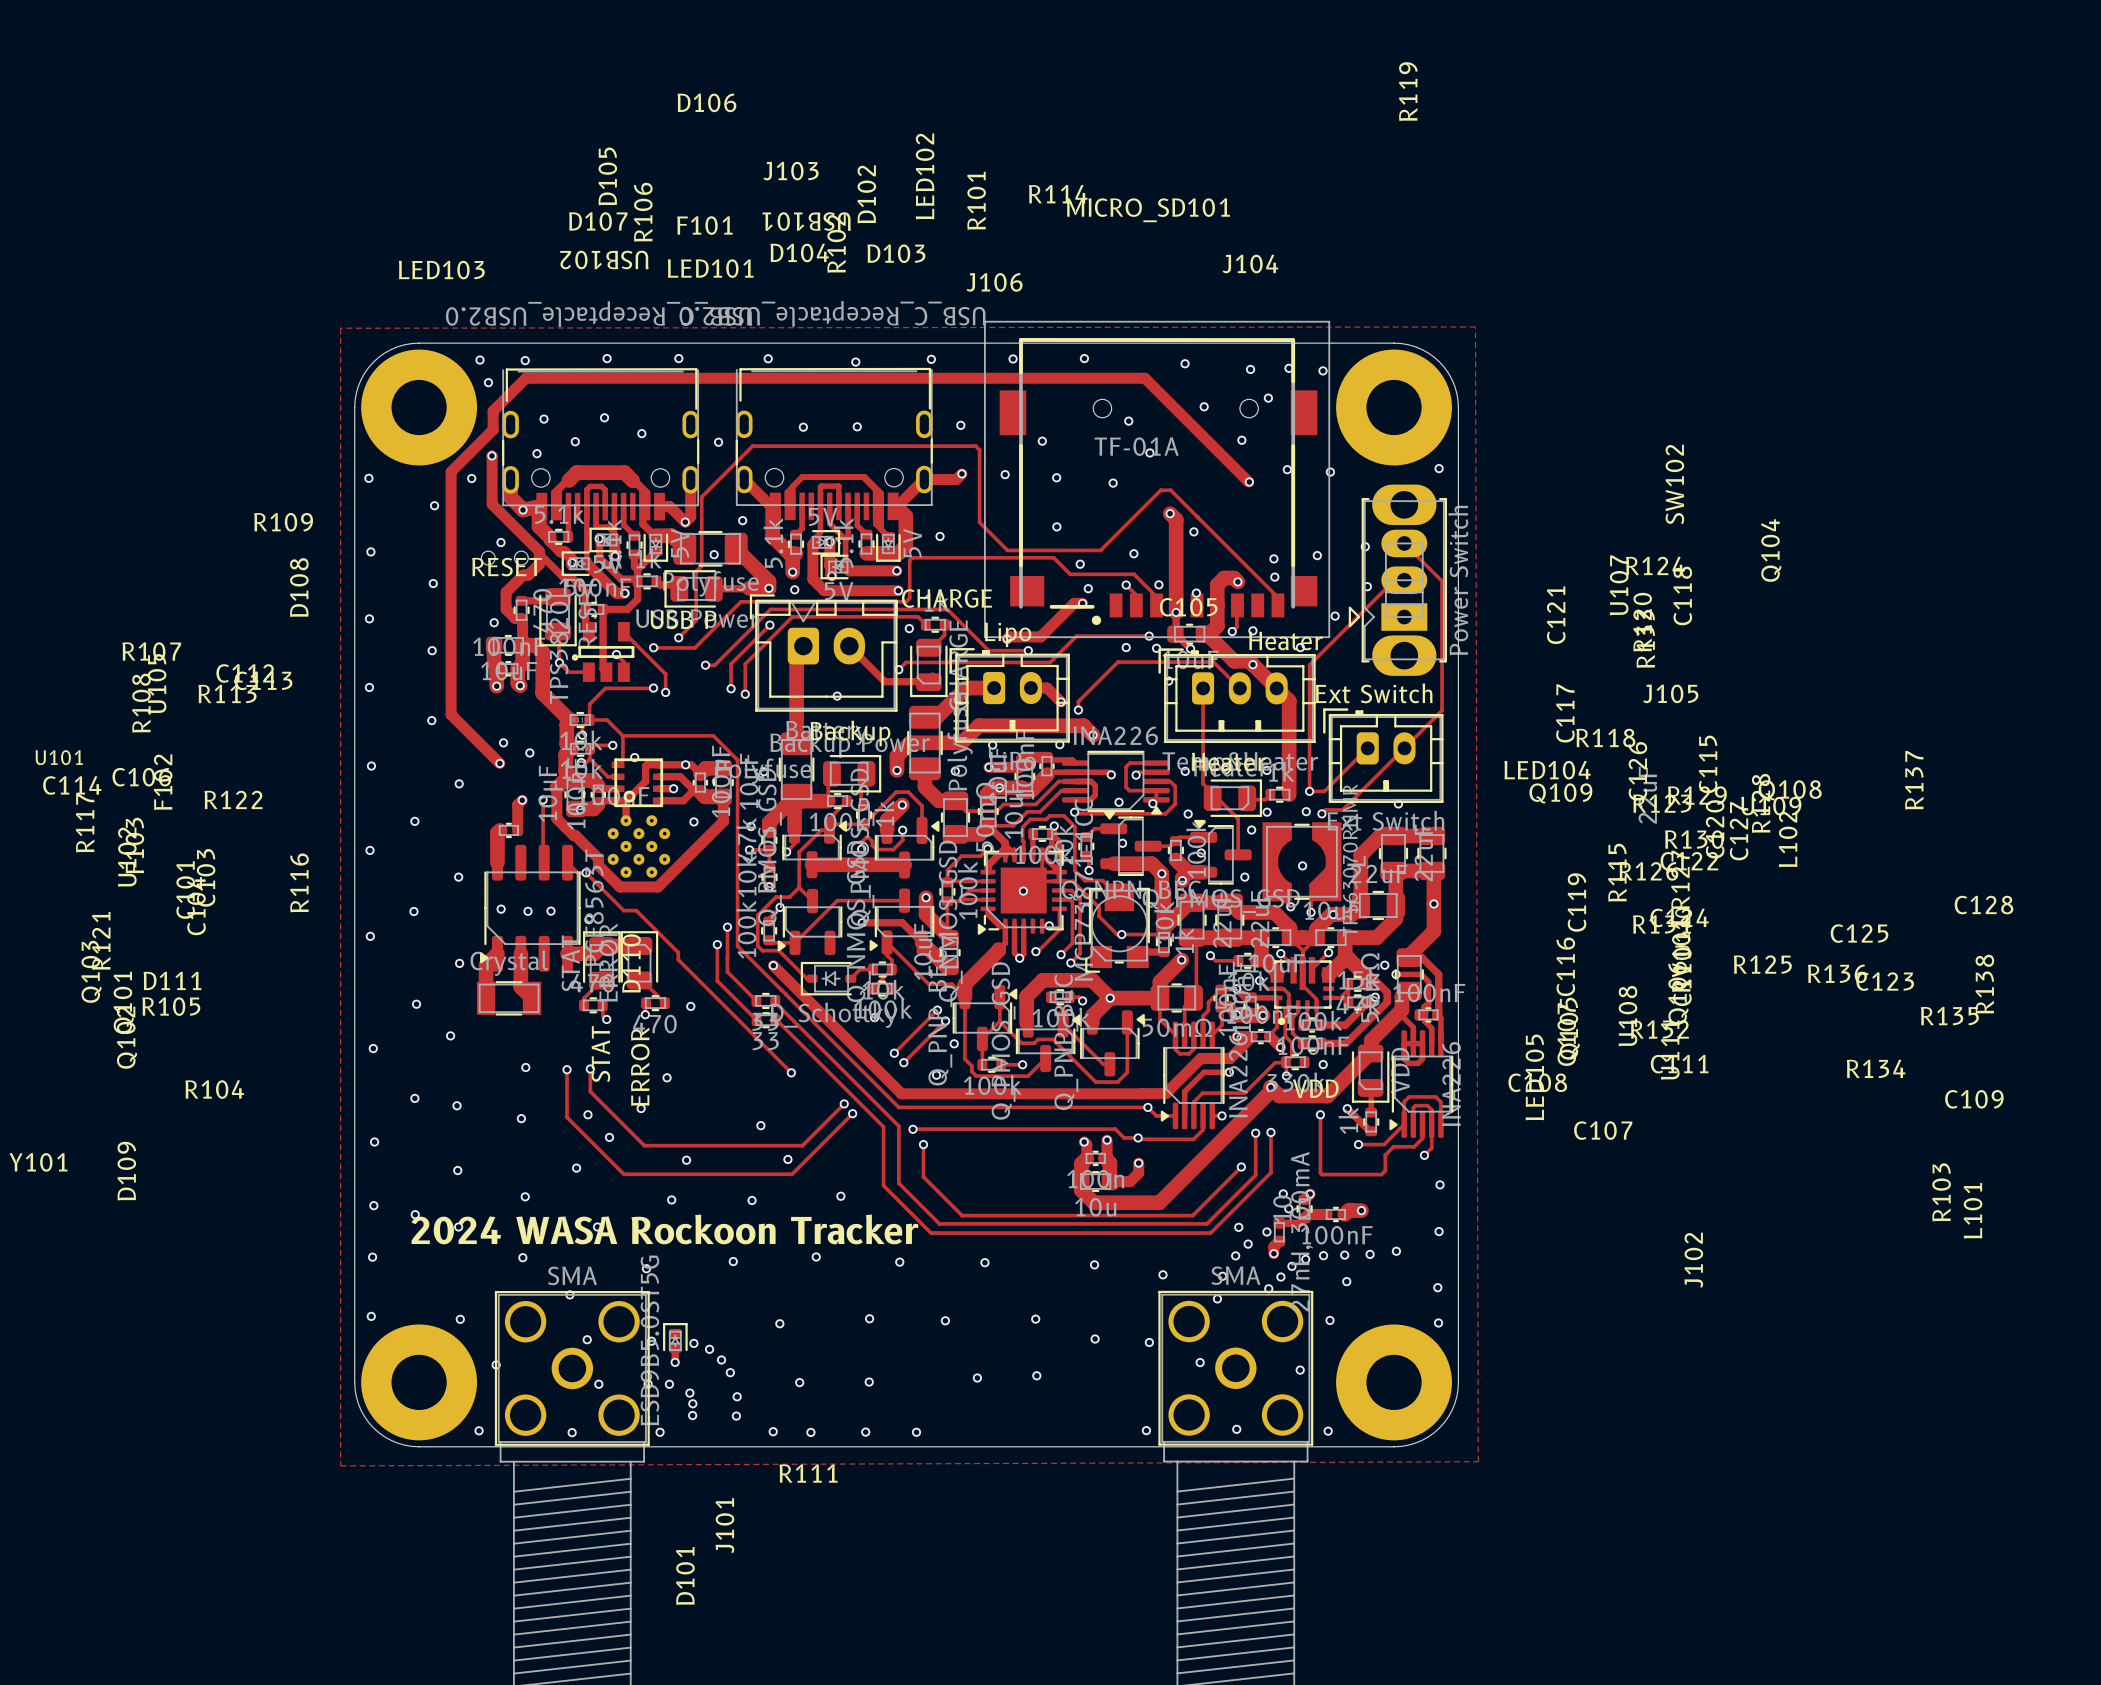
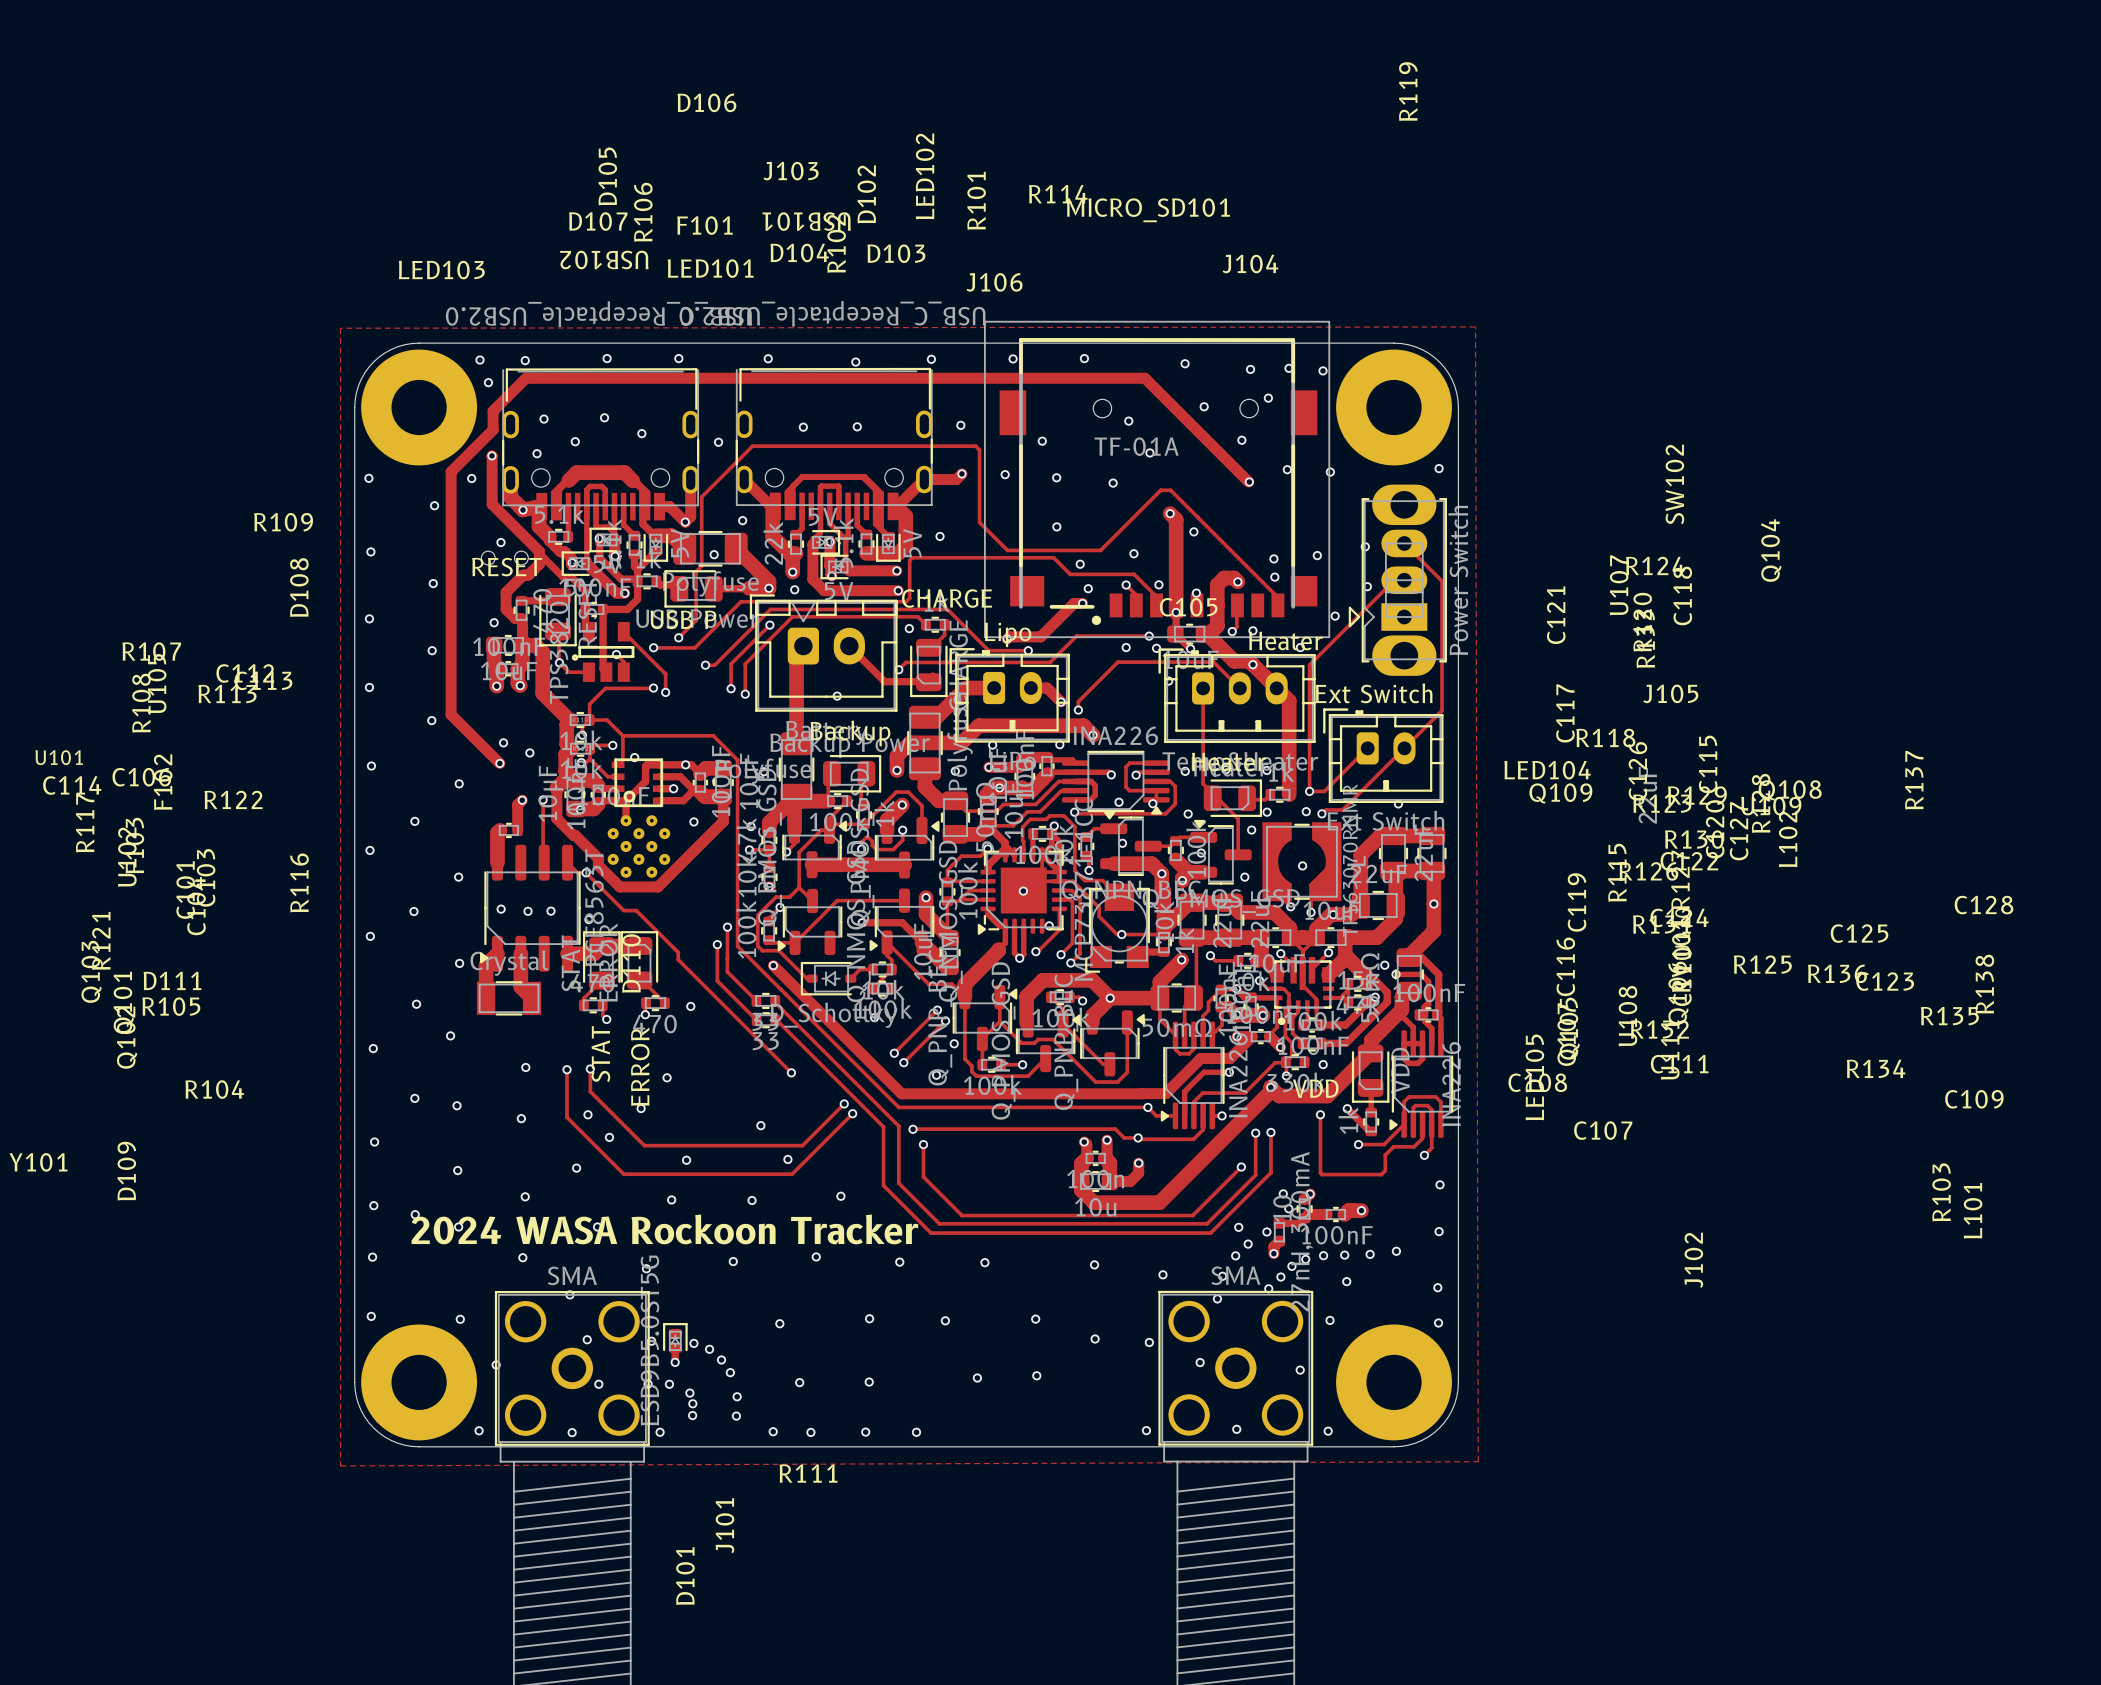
R102 value: 5.1k (773, 542) -> 22k (773, 543)

